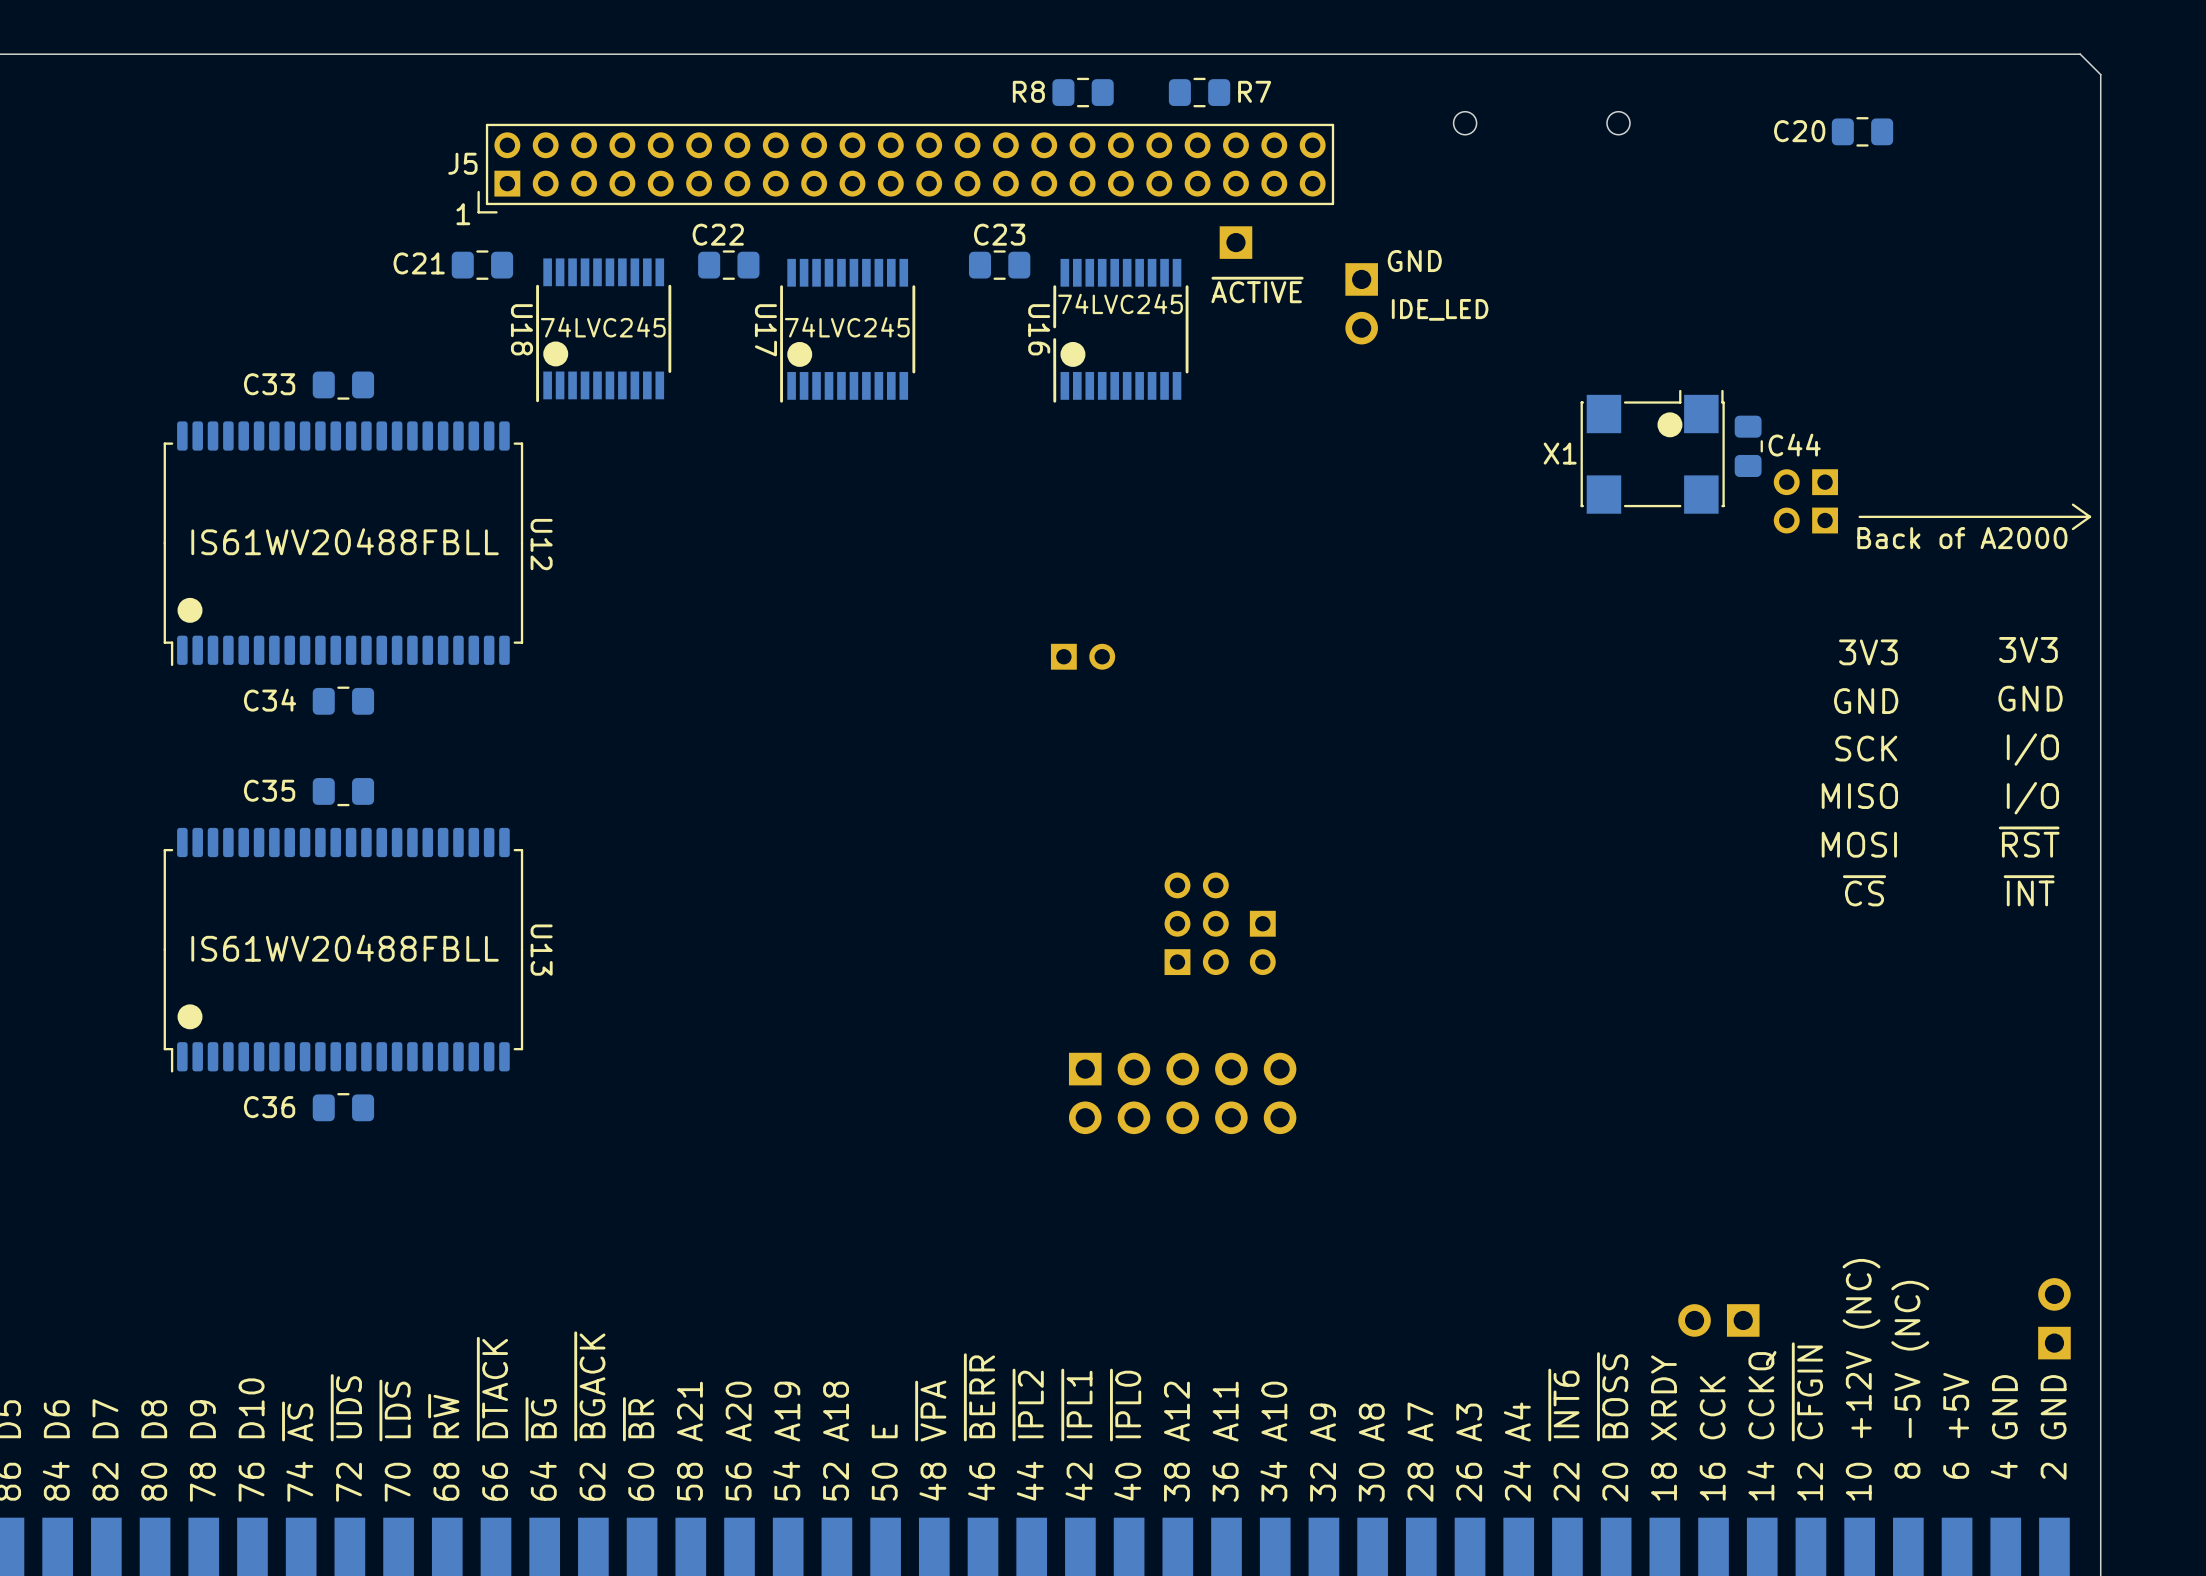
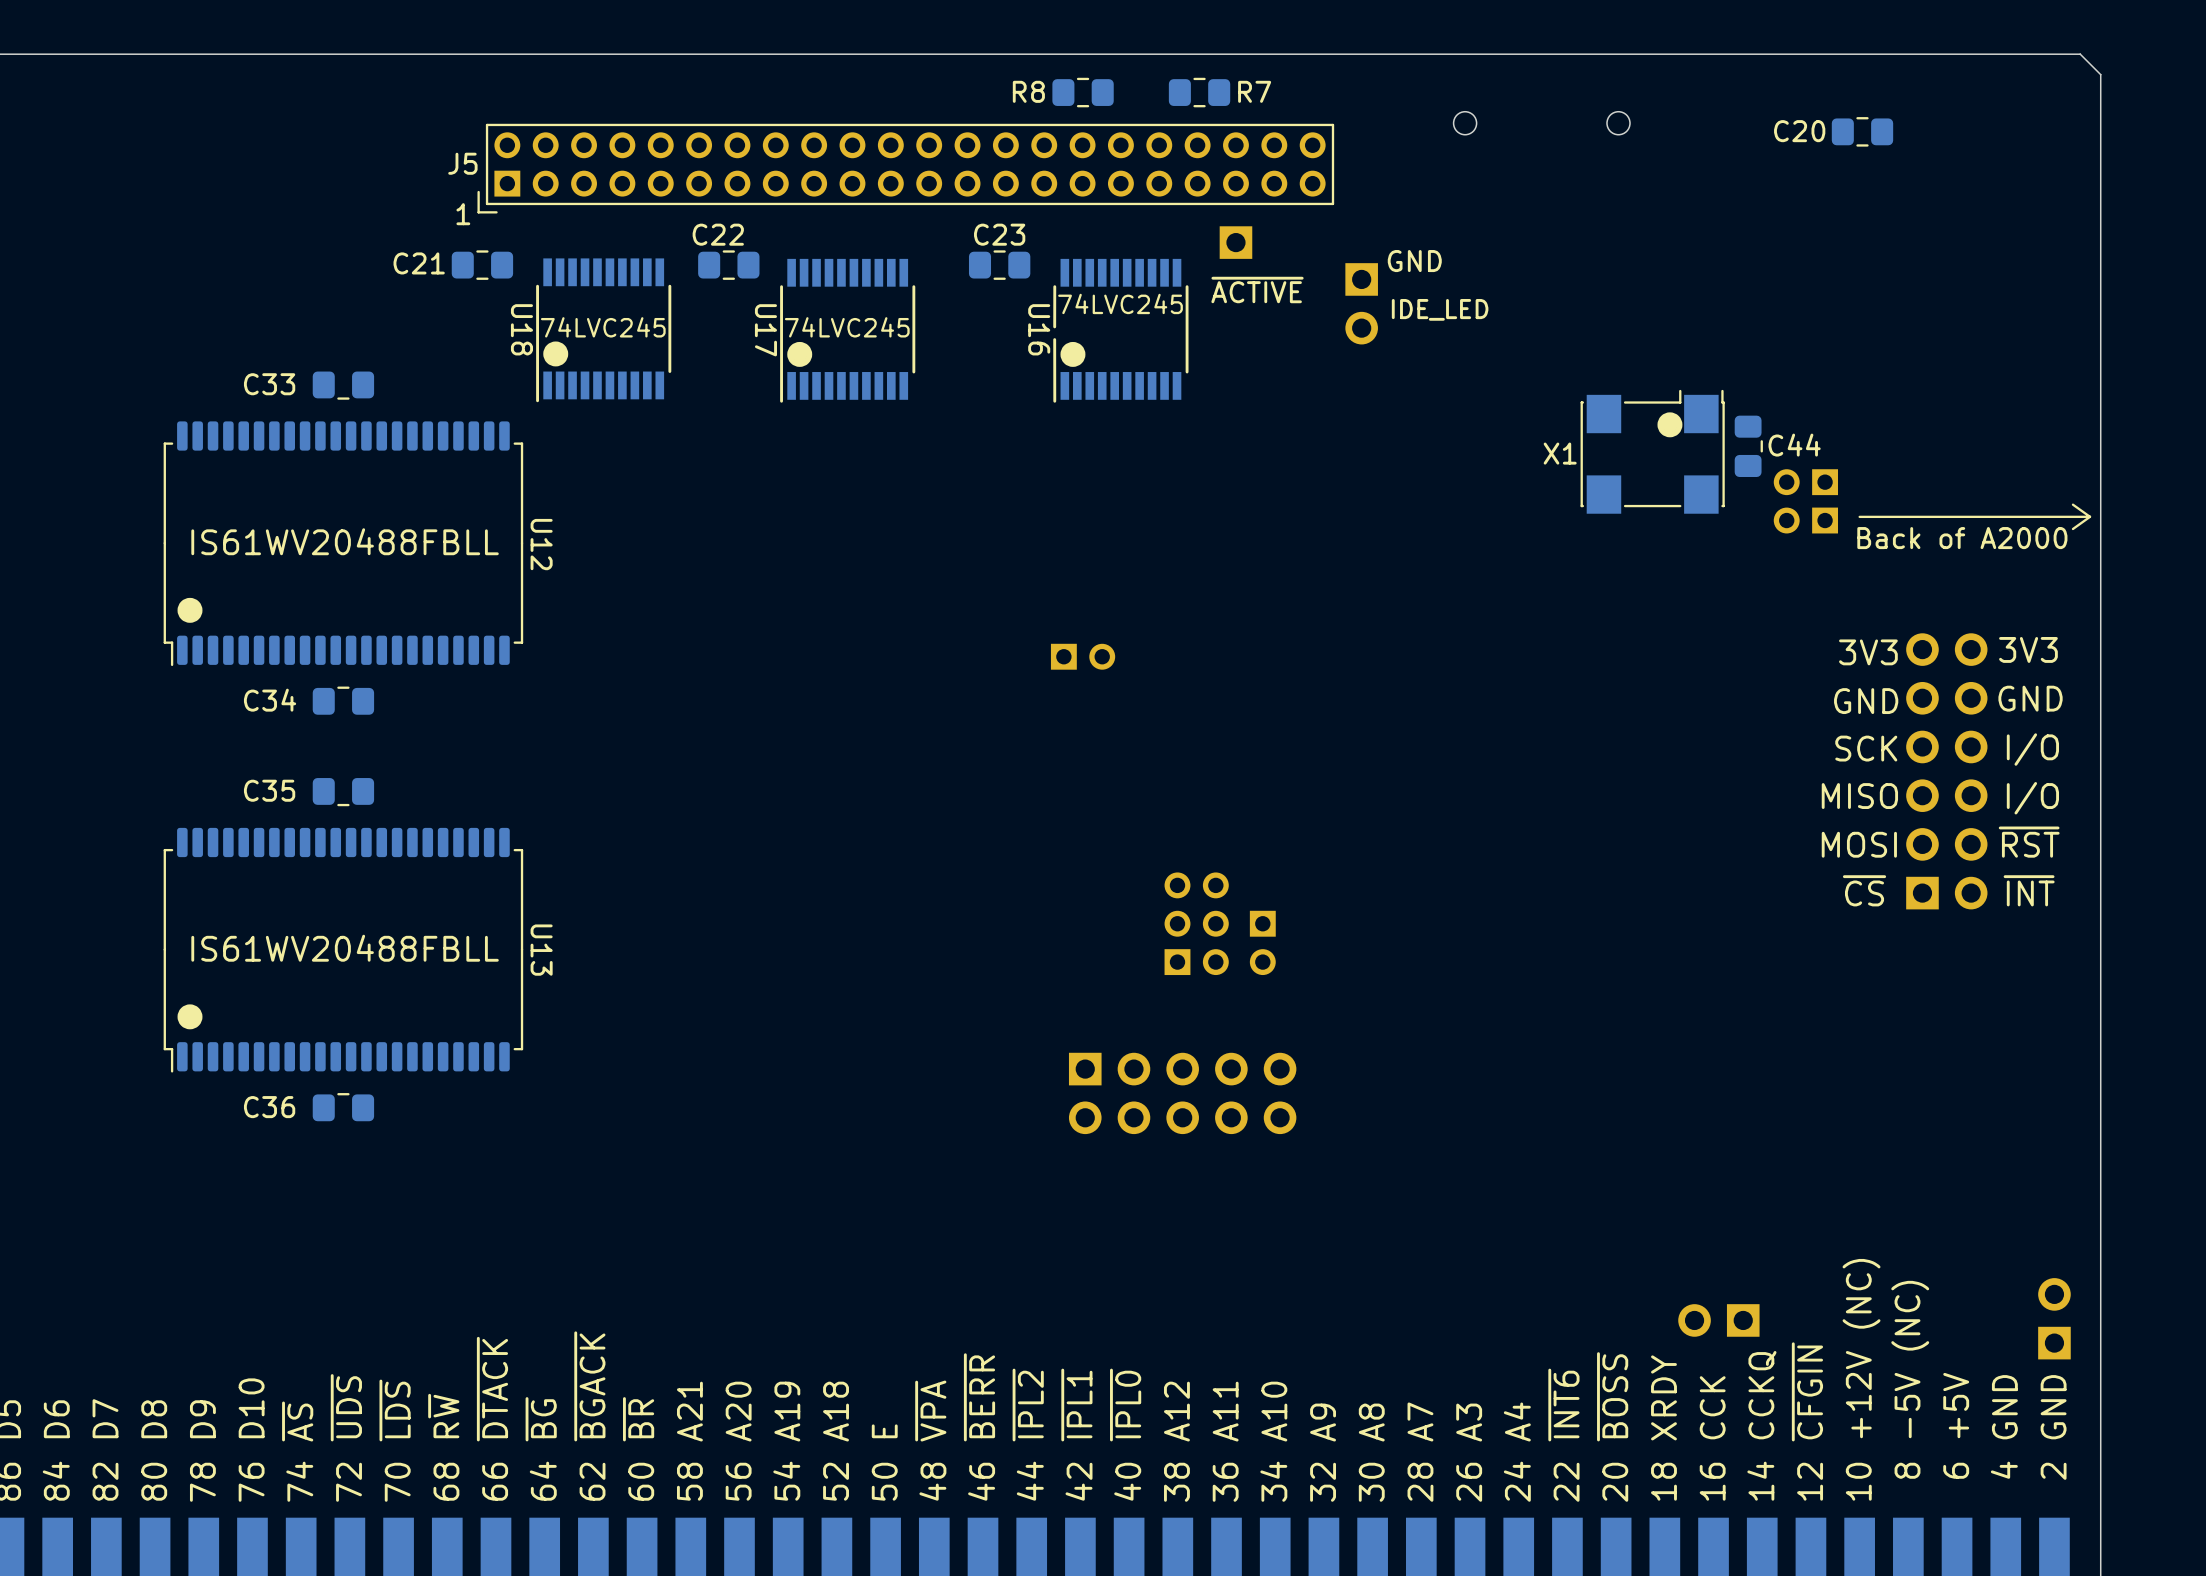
part: none -> (1946, 771)

